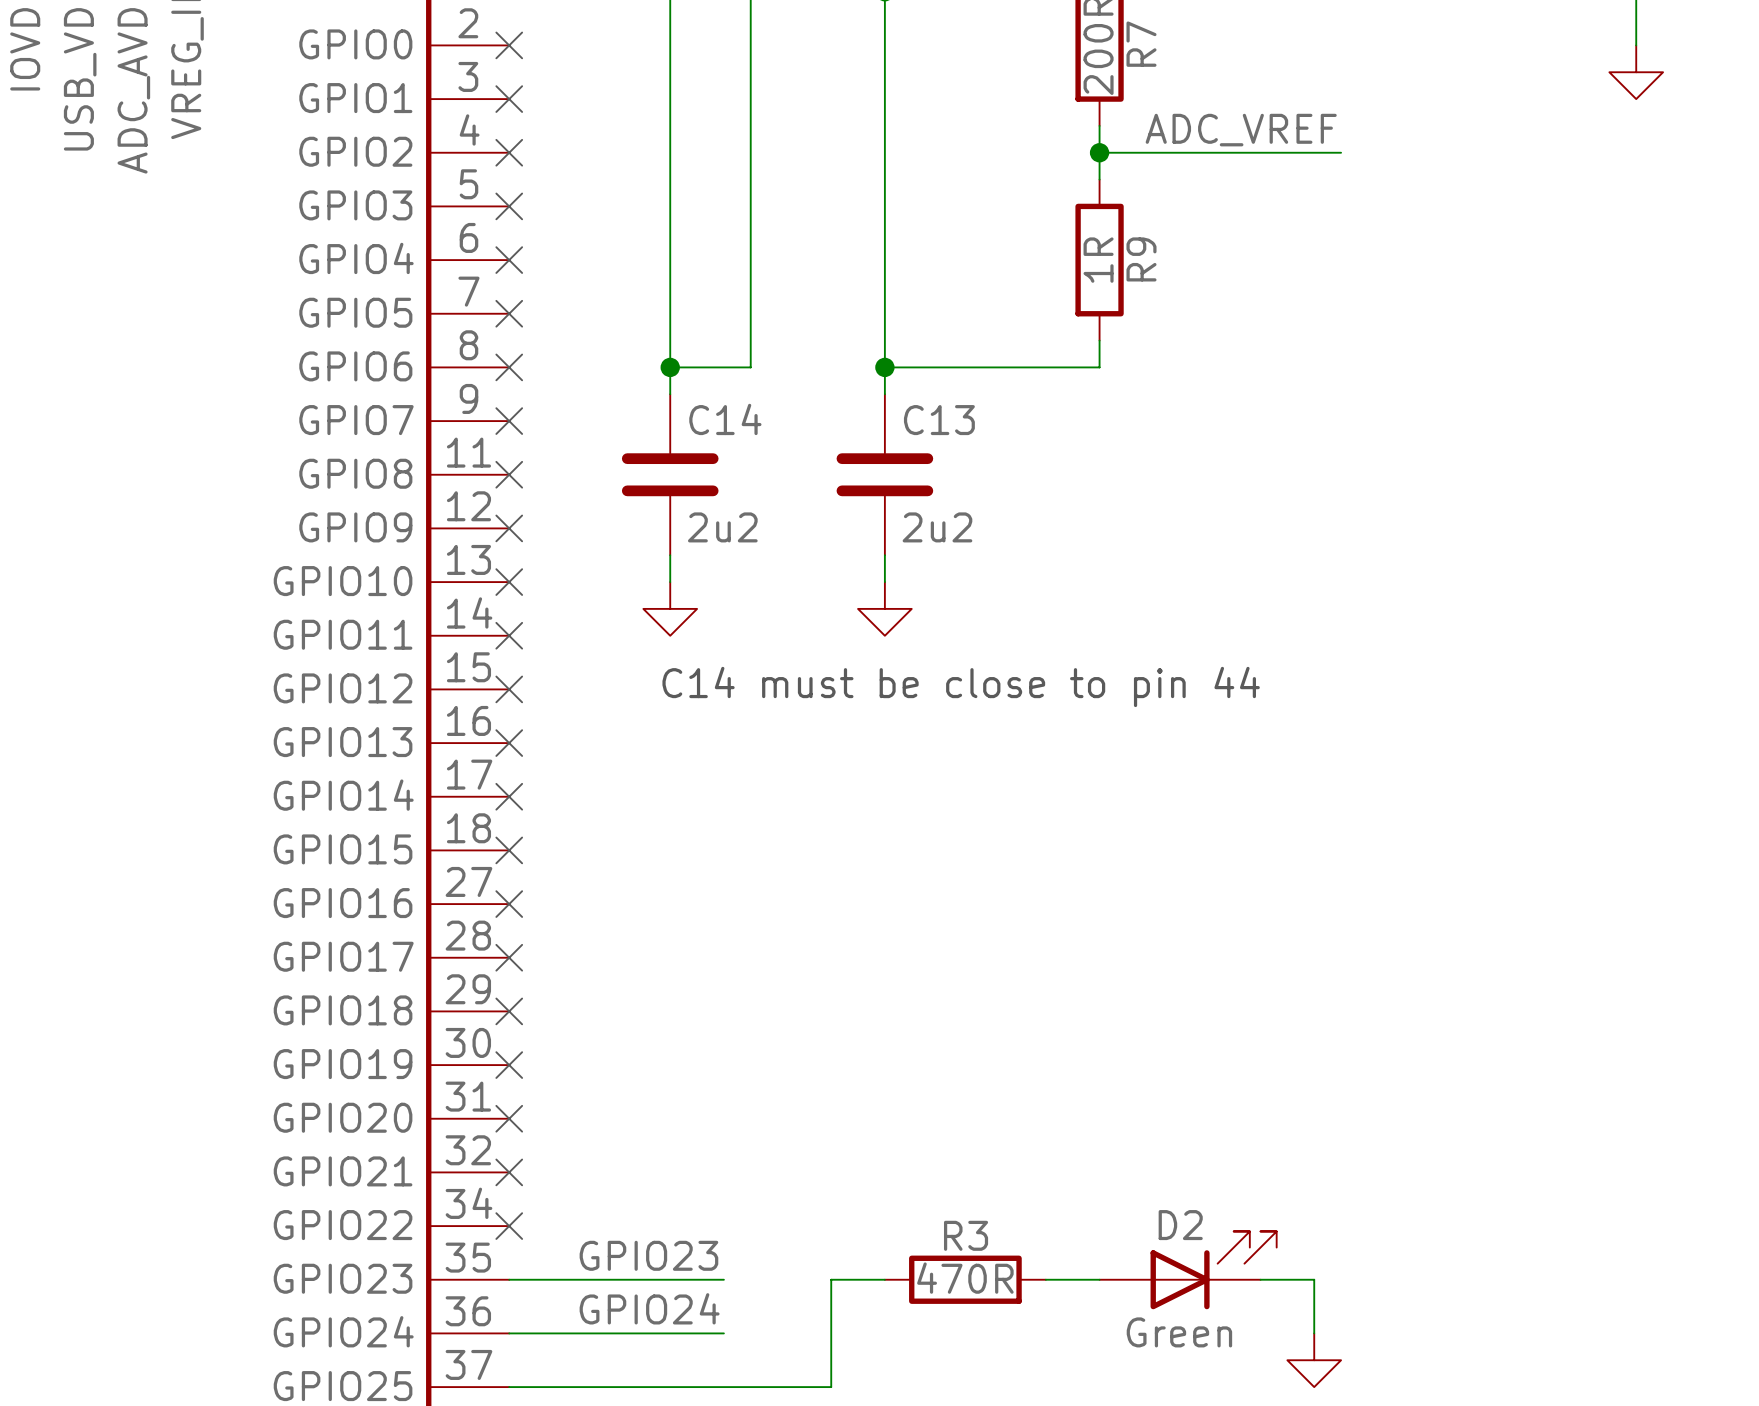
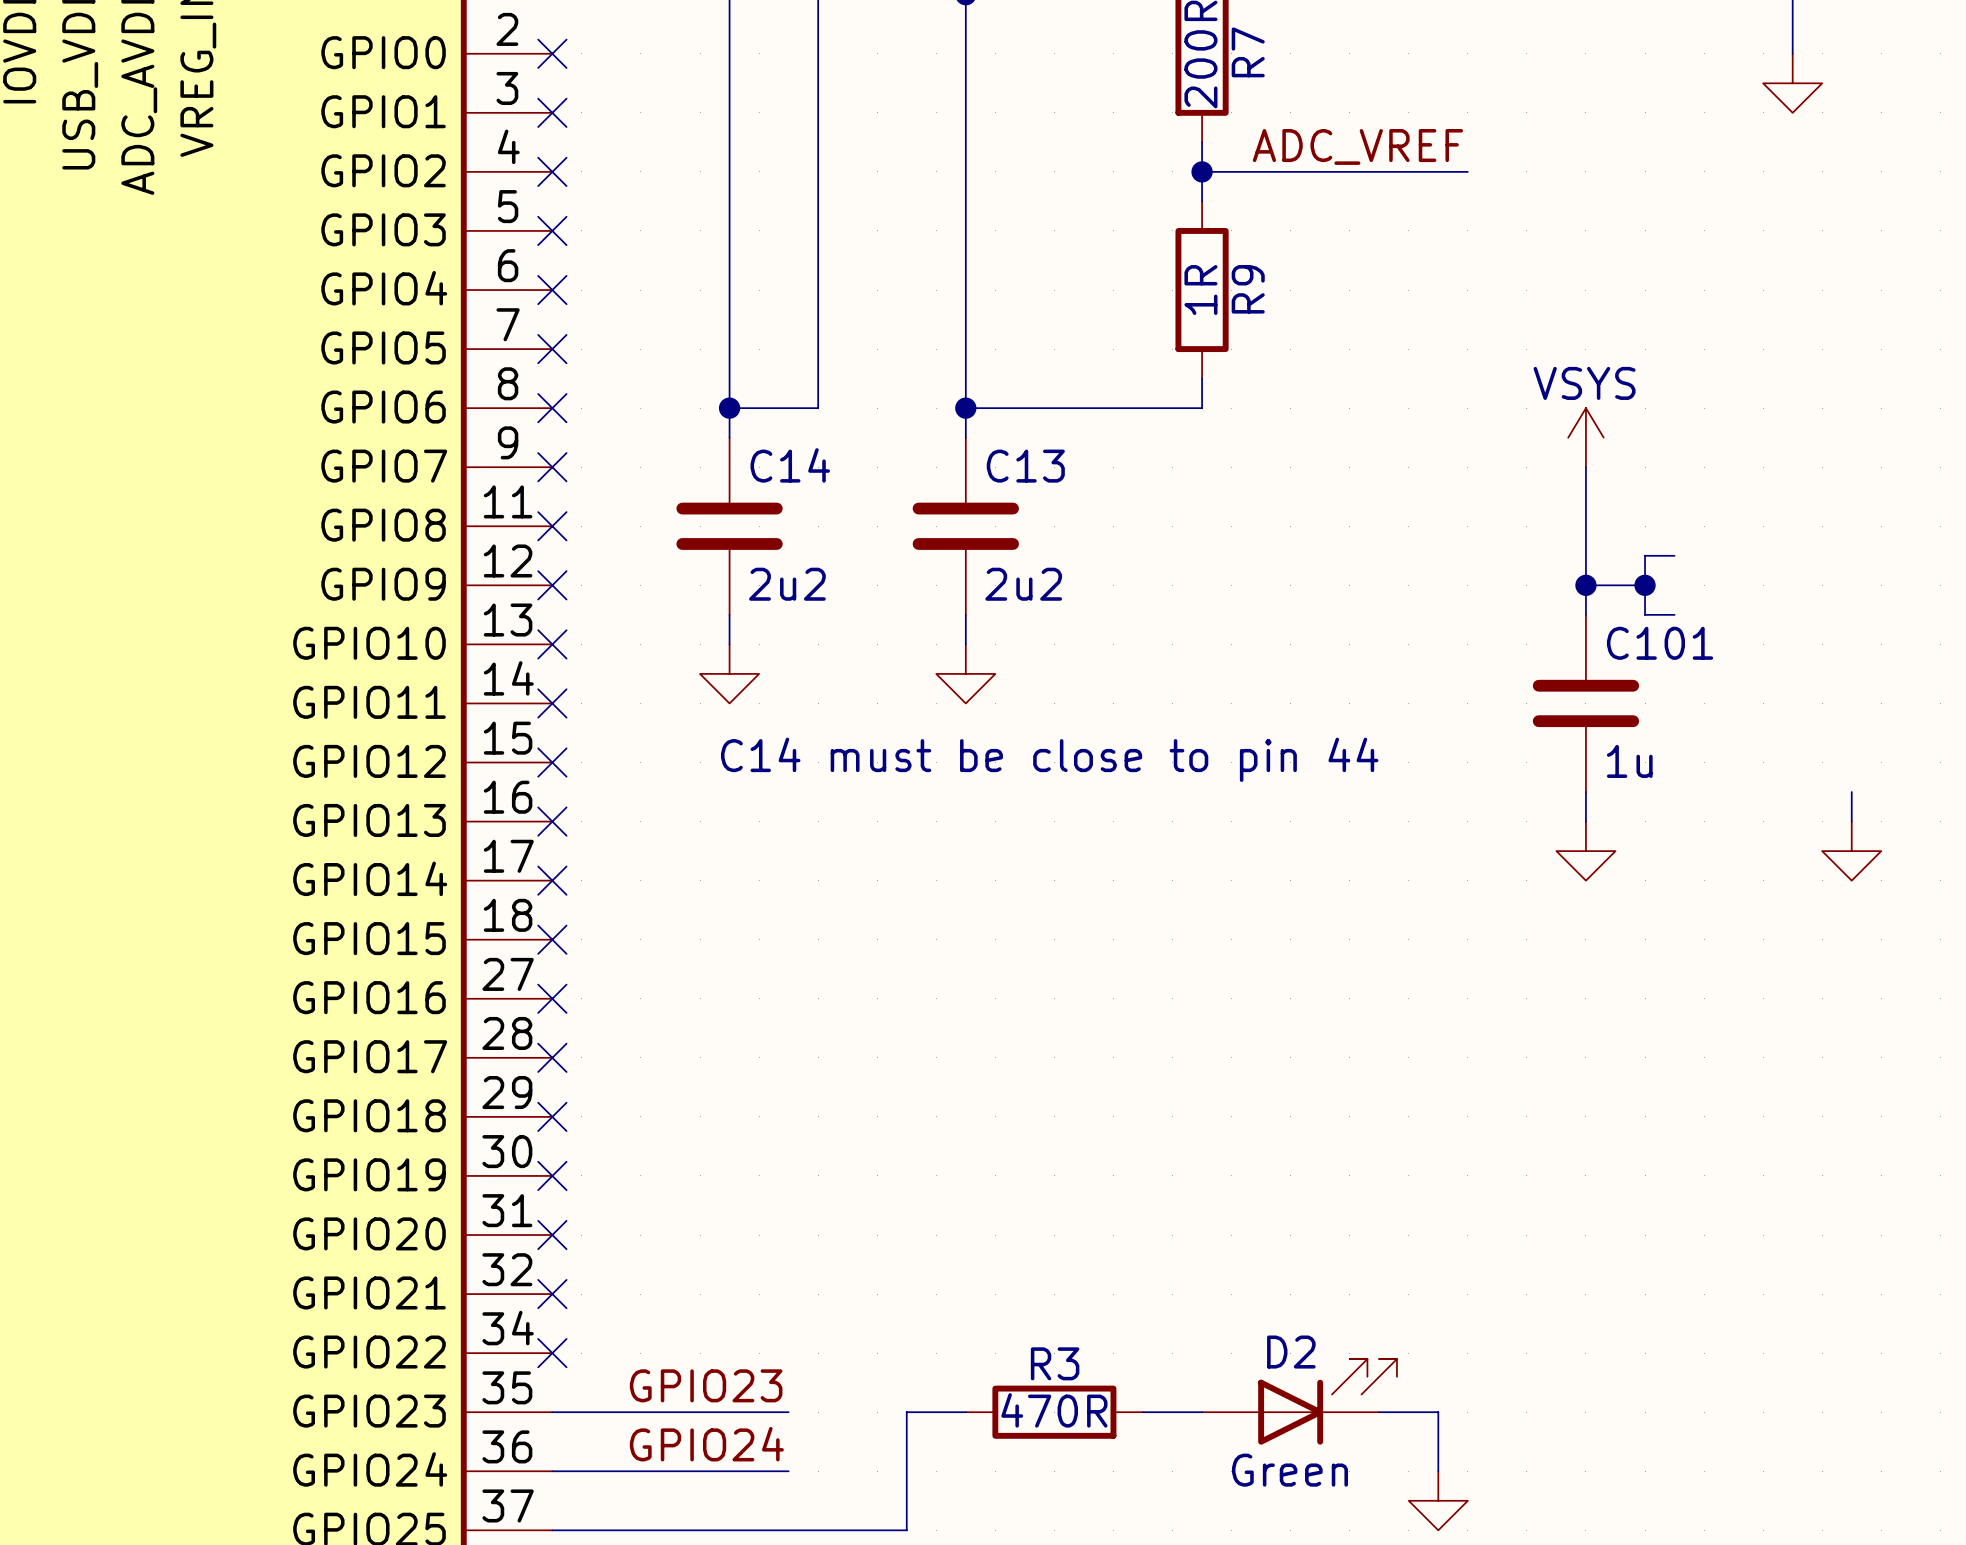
power symbol: none -> VSYS (1585, 437)
wire: none -> (1585, 467) (1585, 614)
wire: none -> (1674, 555) (1645, 555) (1645, 614) (1674, 614)
wire: none -> (1585, 585) (1645, 585)
junction: none -> (1585, 585)
junction: none -> (1645, 585)
C101: none -> 1u (1585, 703)
wire: none -> (1585, 792) (1585, 821)
wire: none -> (1851, 792) (1851, 821)
power symbol: none -> (1585, 851)
power symbol: none -> (1851, 851)

